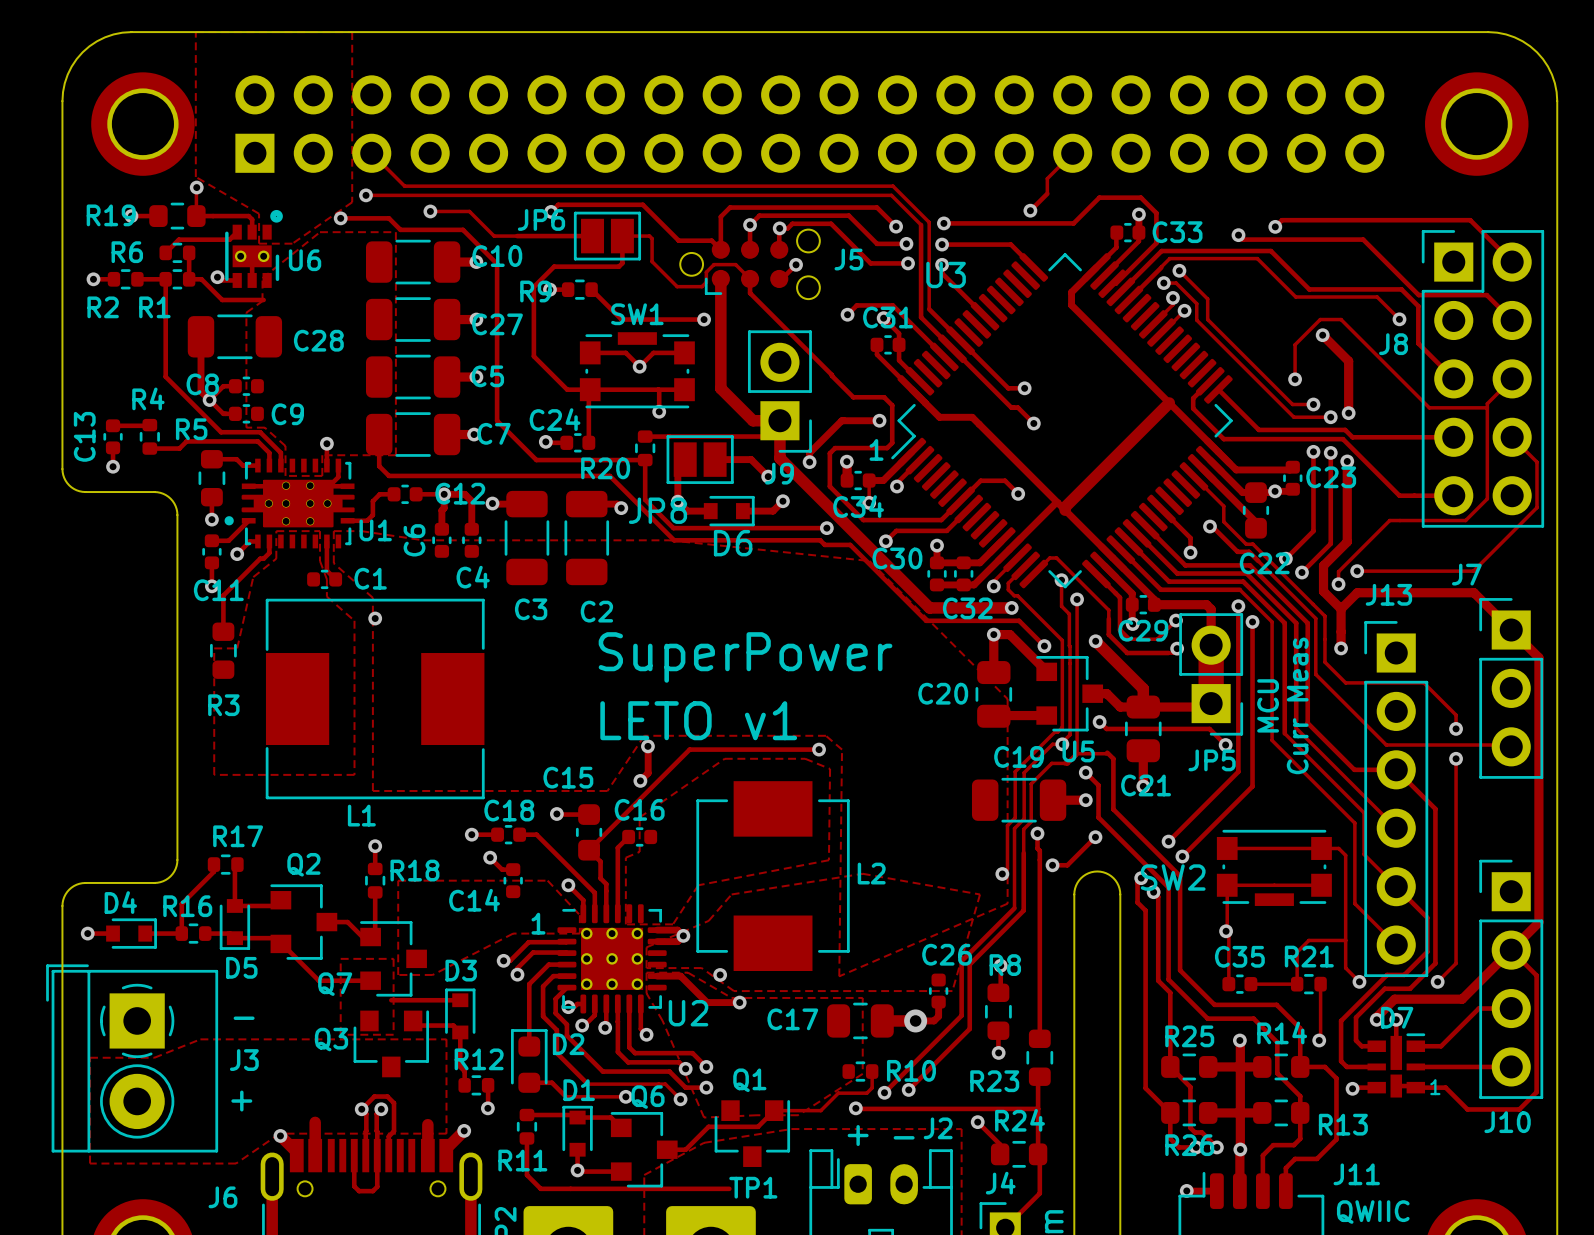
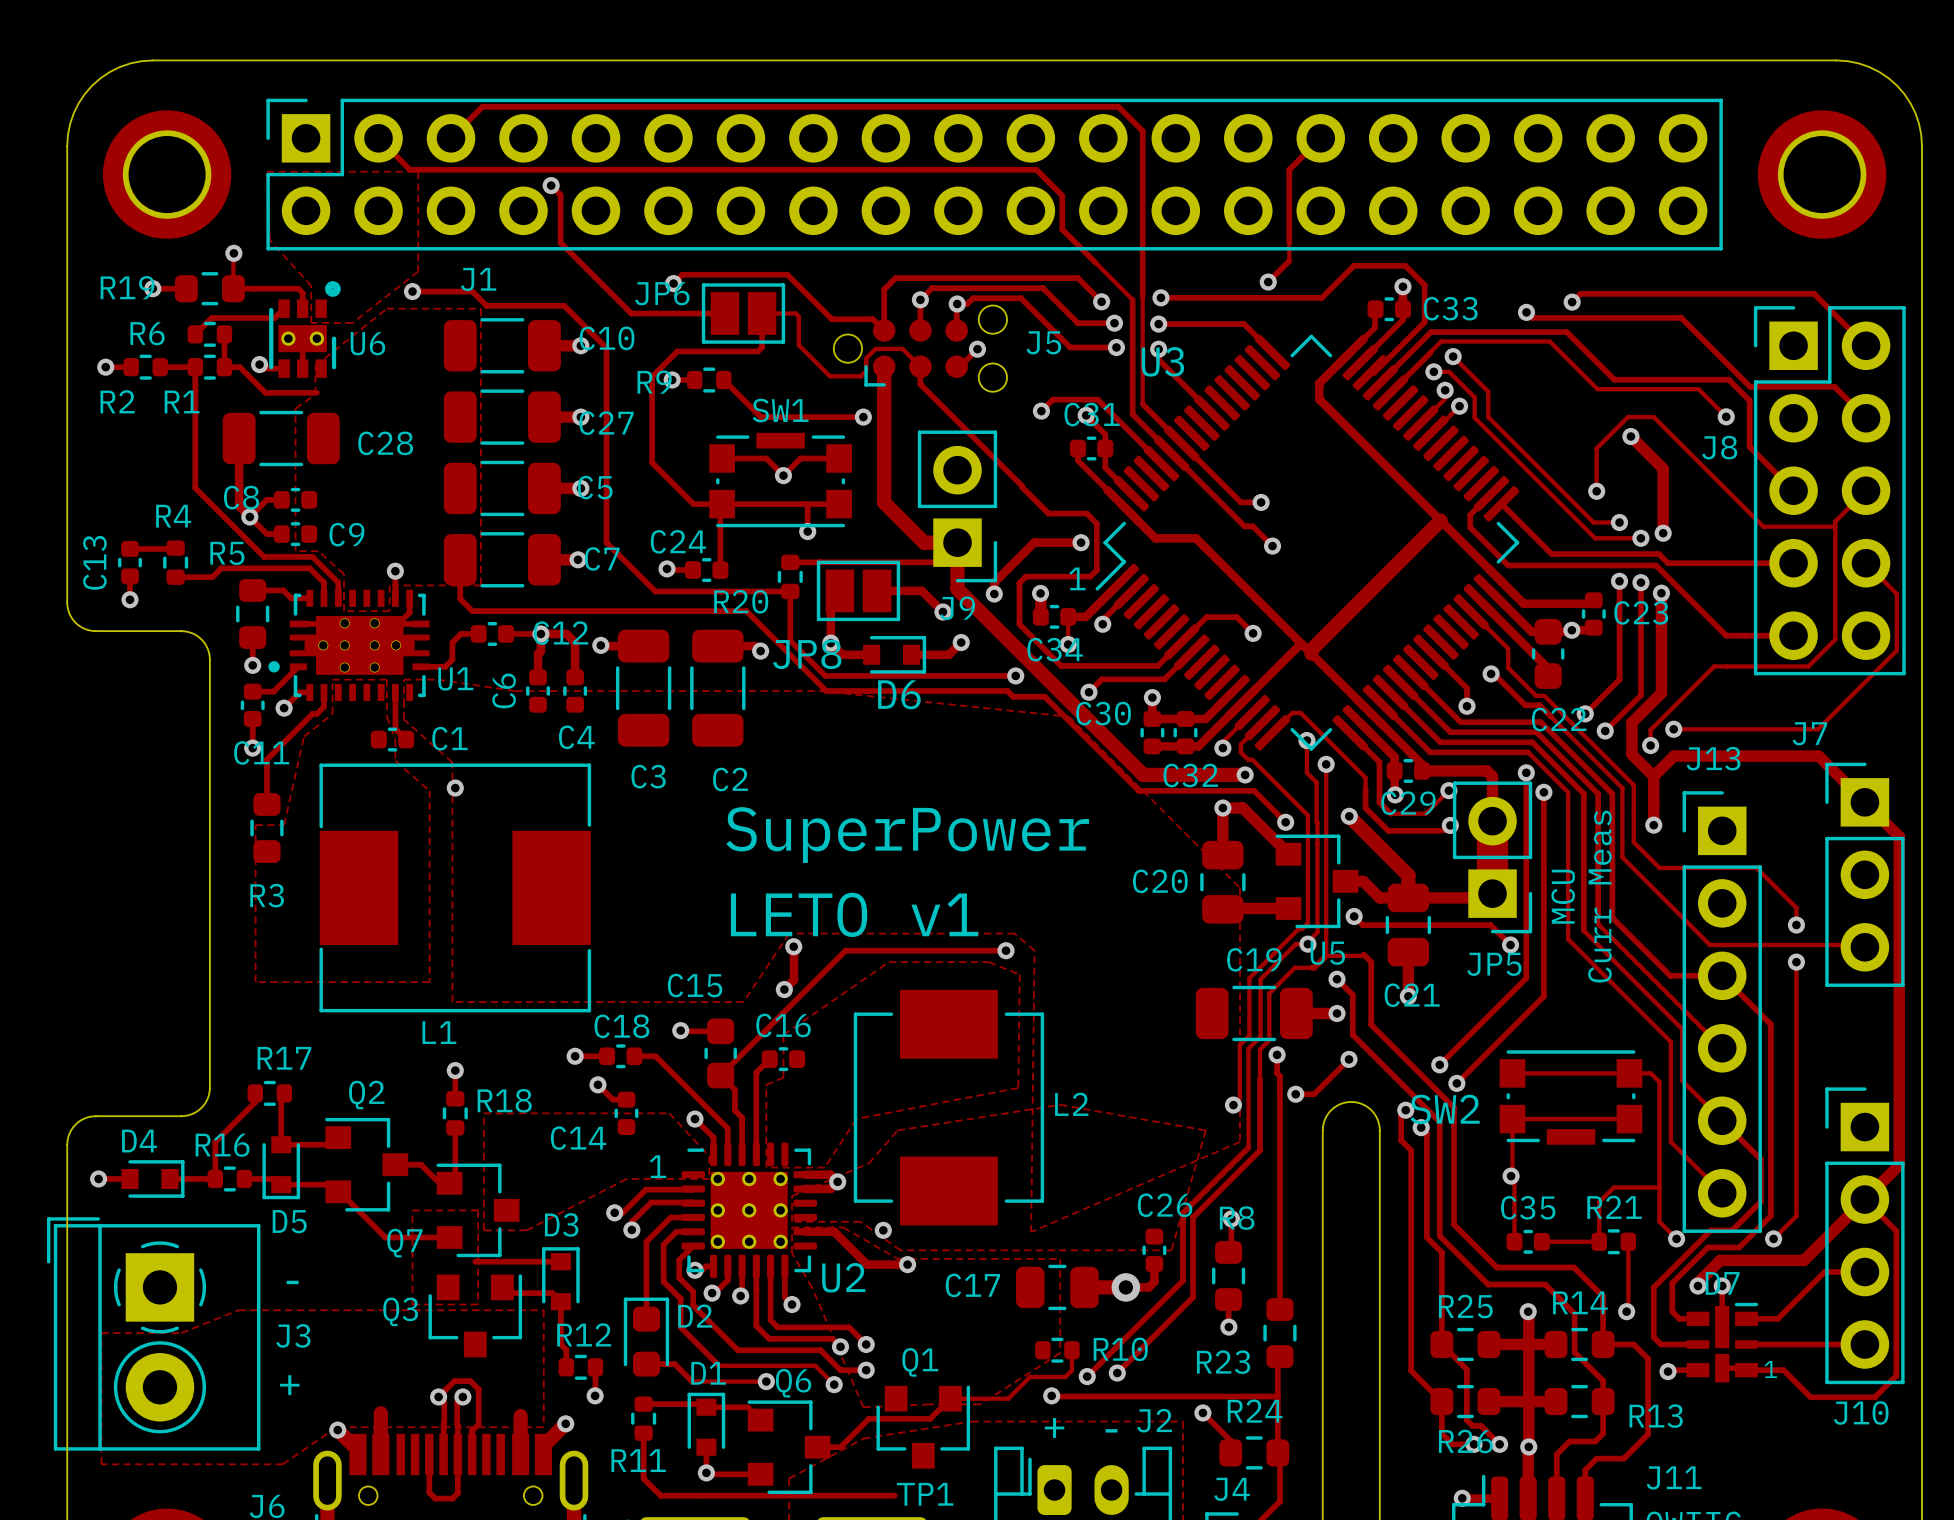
J1 side: bottom (809, 124) -> top (994, 174)
via: none -> (551, 185)
track: (371, 153) (404, 186) (893, 186) (929, 222) -> (451, 138) (482, 106) (1118, 106) (1142, 131) (1142, 296)
track: (1072, 153) (1047, 178) -> (1320, 138) (1289, 169) (1289, 242)
track: (366, 195) (891, 195) -> (378, 138) (410, 169) (1036, 169) (1062, 195) (1062, 229) (1095, 263)
via: (366, 195) -> none
track: (430, 211) (469, 211) (494, 236) (517, 236) -> (551, 185) (560, 195) (560, 242) (631, 313)
via: (430, 211) -> none
zone outline: (259, 213) (195, 176) (195, 32) (352, 32) (352, 202) (292, 243) -> (311, 285) (269, 240) (266, 171) (418, 171) (418, 271) (352, 322)

